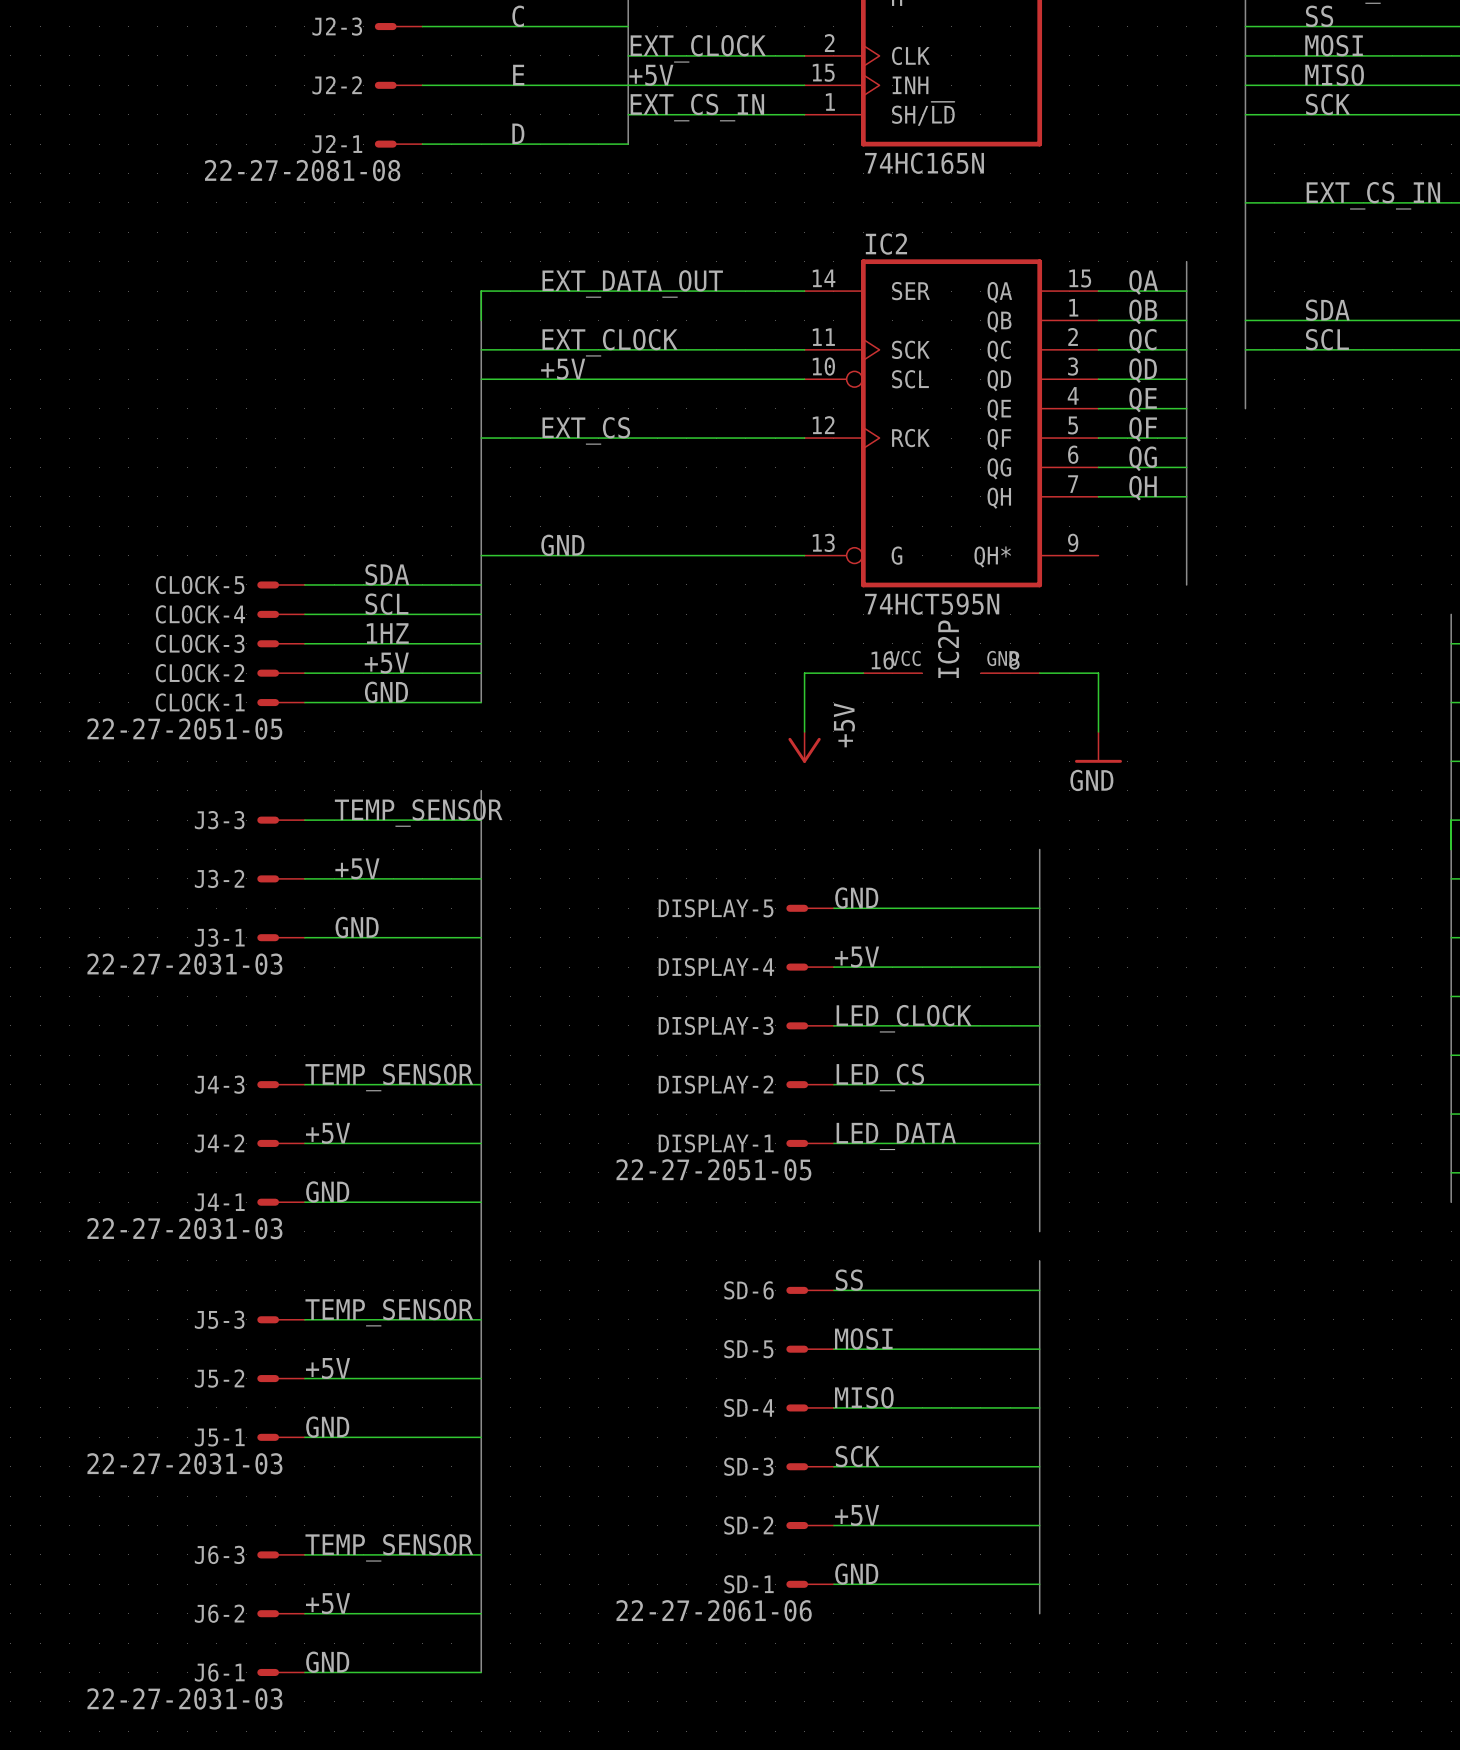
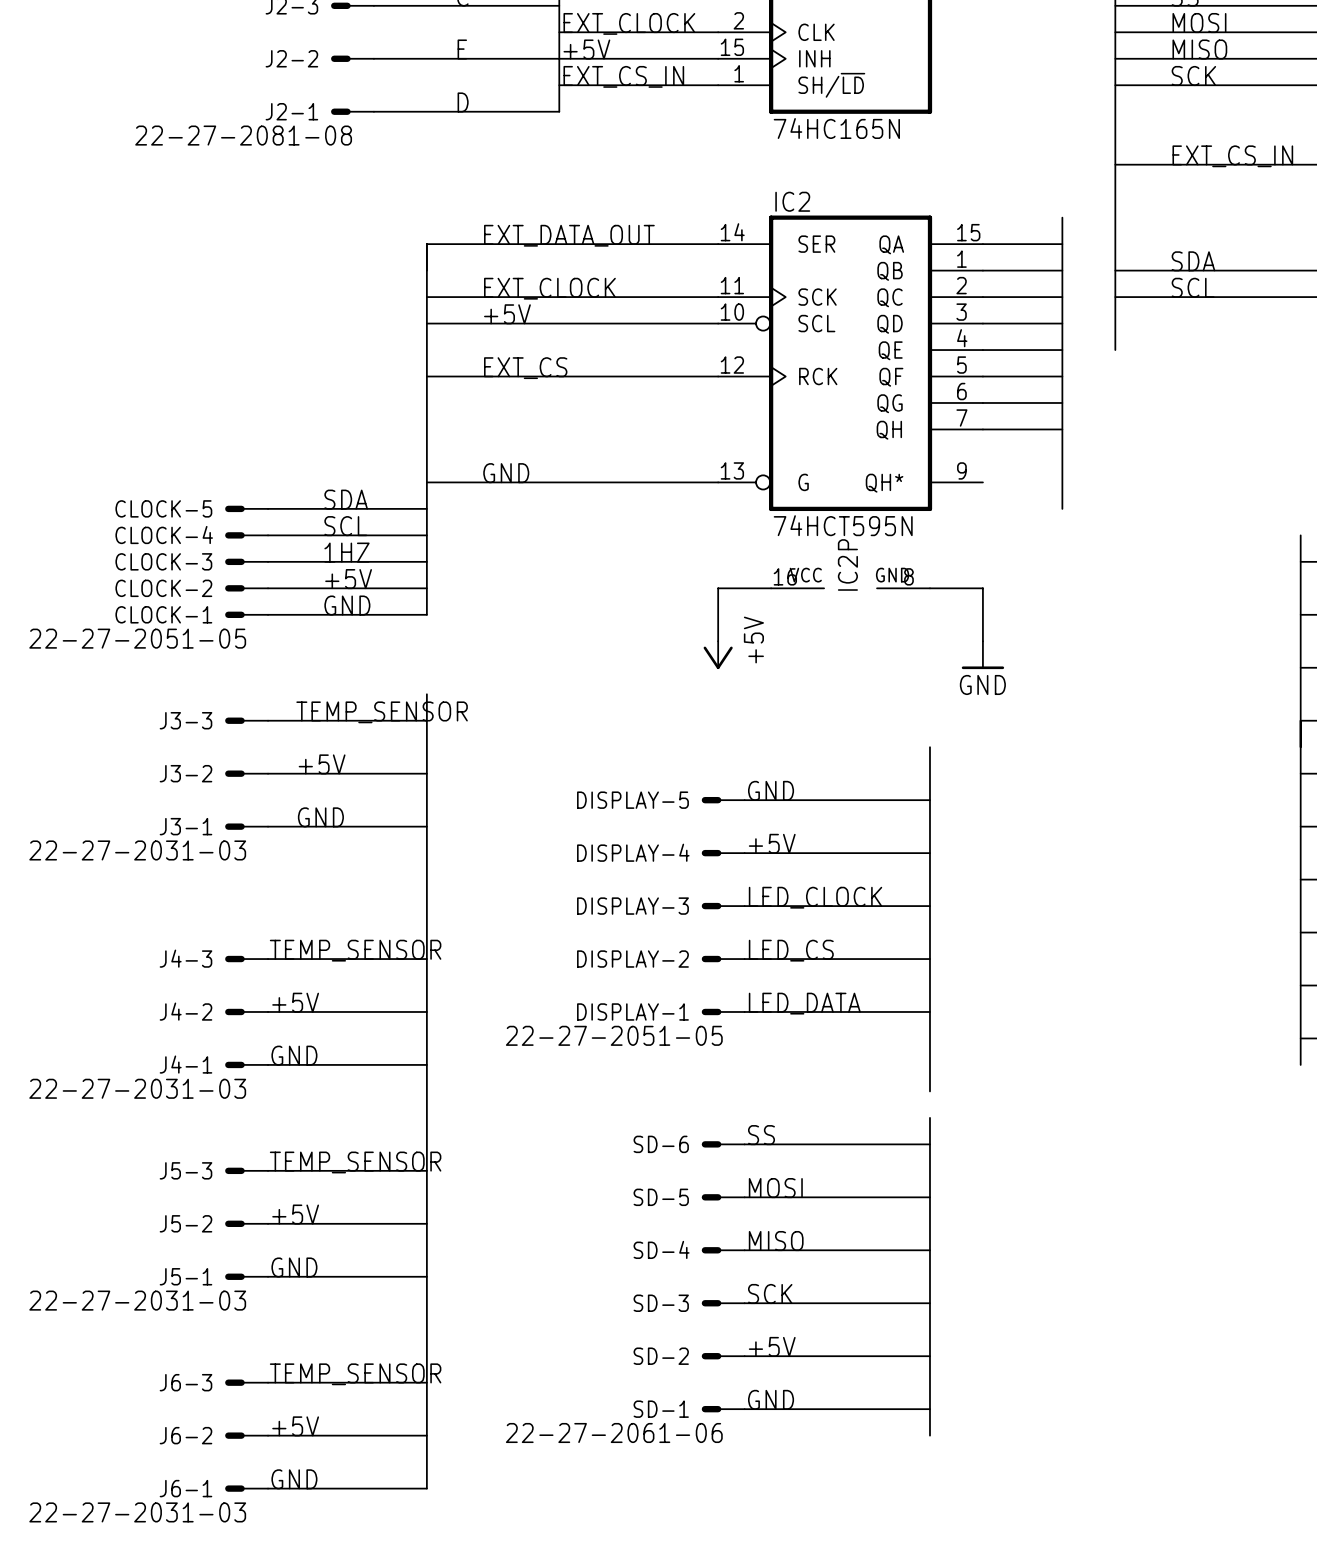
label: QA (1143, 282) -> none
label: QB (1143, 311) -> none
label: QC (1142, 341) -> none
label: QD (1143, 370) -> none
label: QE (1143, 400) -> none
label: QF (1143, 429) -> none
label: QG (1143, 458) -> none
label: QH (1143, 488) -> none

